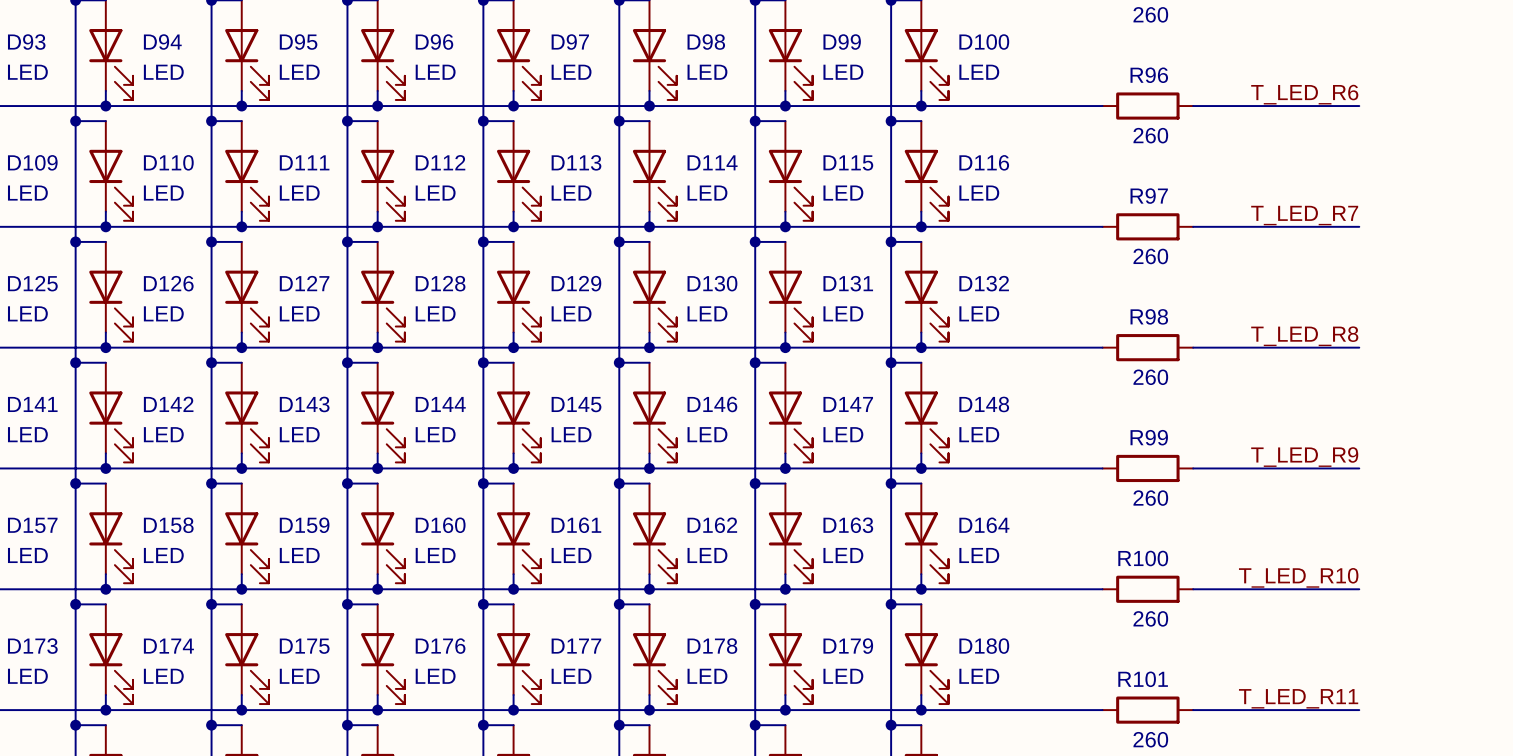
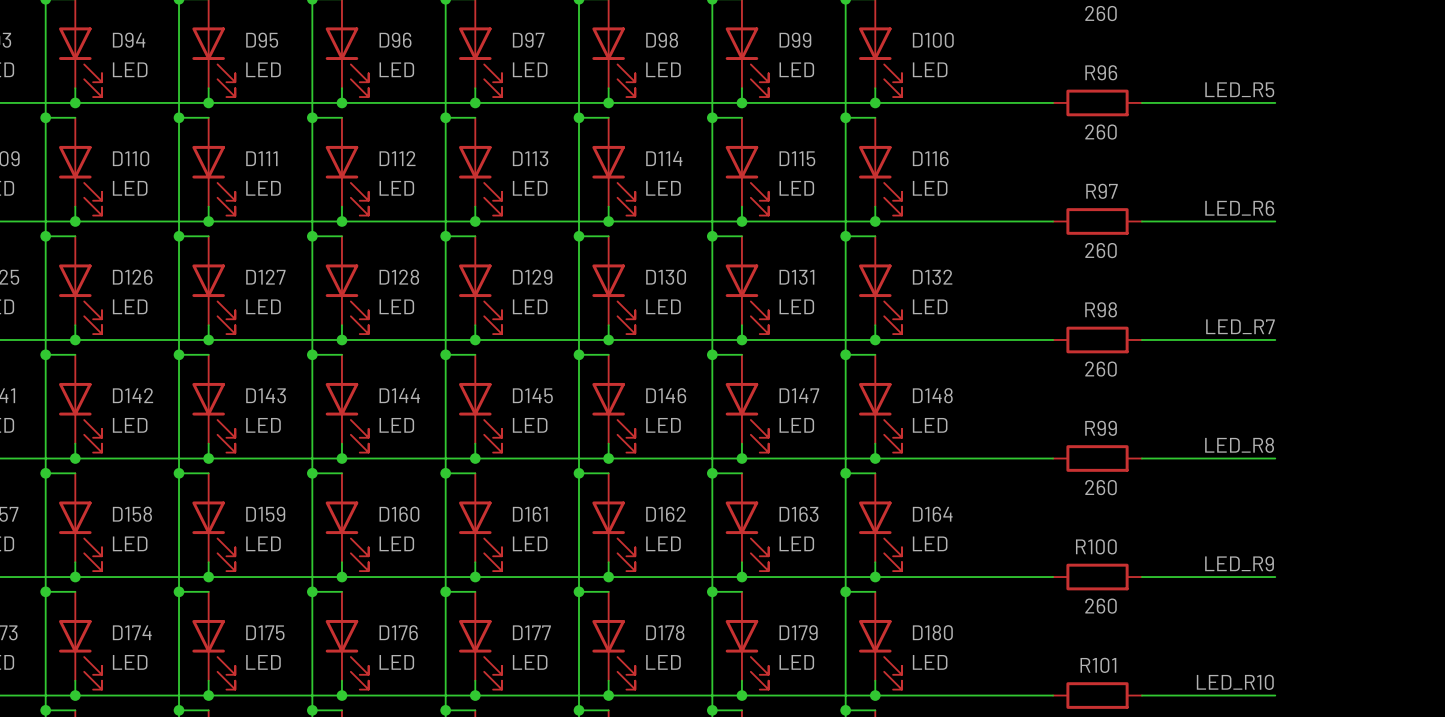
label: T_LED_R6 (1304, 94) -> LED_R5 (1239, 89)
wire: (1329, 106) (1359, 106) -> none
label: T_LED_R7 (1304, 215) -> LED_R6 (1239, 208)
wire: (1329, 226) (1359, 226) -> none
label: T_LED_R8 (1304, 336) -> LED_R7 (1240, 326)
wire: (1329, 347) (1359, 347) -> none
label: T_LED_R9 (1304, 457) -> LED_R8 (1239, 445)
wire: (1329, 468) (1359, 468) -> none
label: T_LED_R10 (1298, 577) -> LED_R9 (1239, 563)
wire: (1329, 589) (1359, 589) -> none
label: T_LED_R11 (1298, 698) -> LED_R10 (1235, 682)
wire: (1329, 710) (1359, 710) -> none

